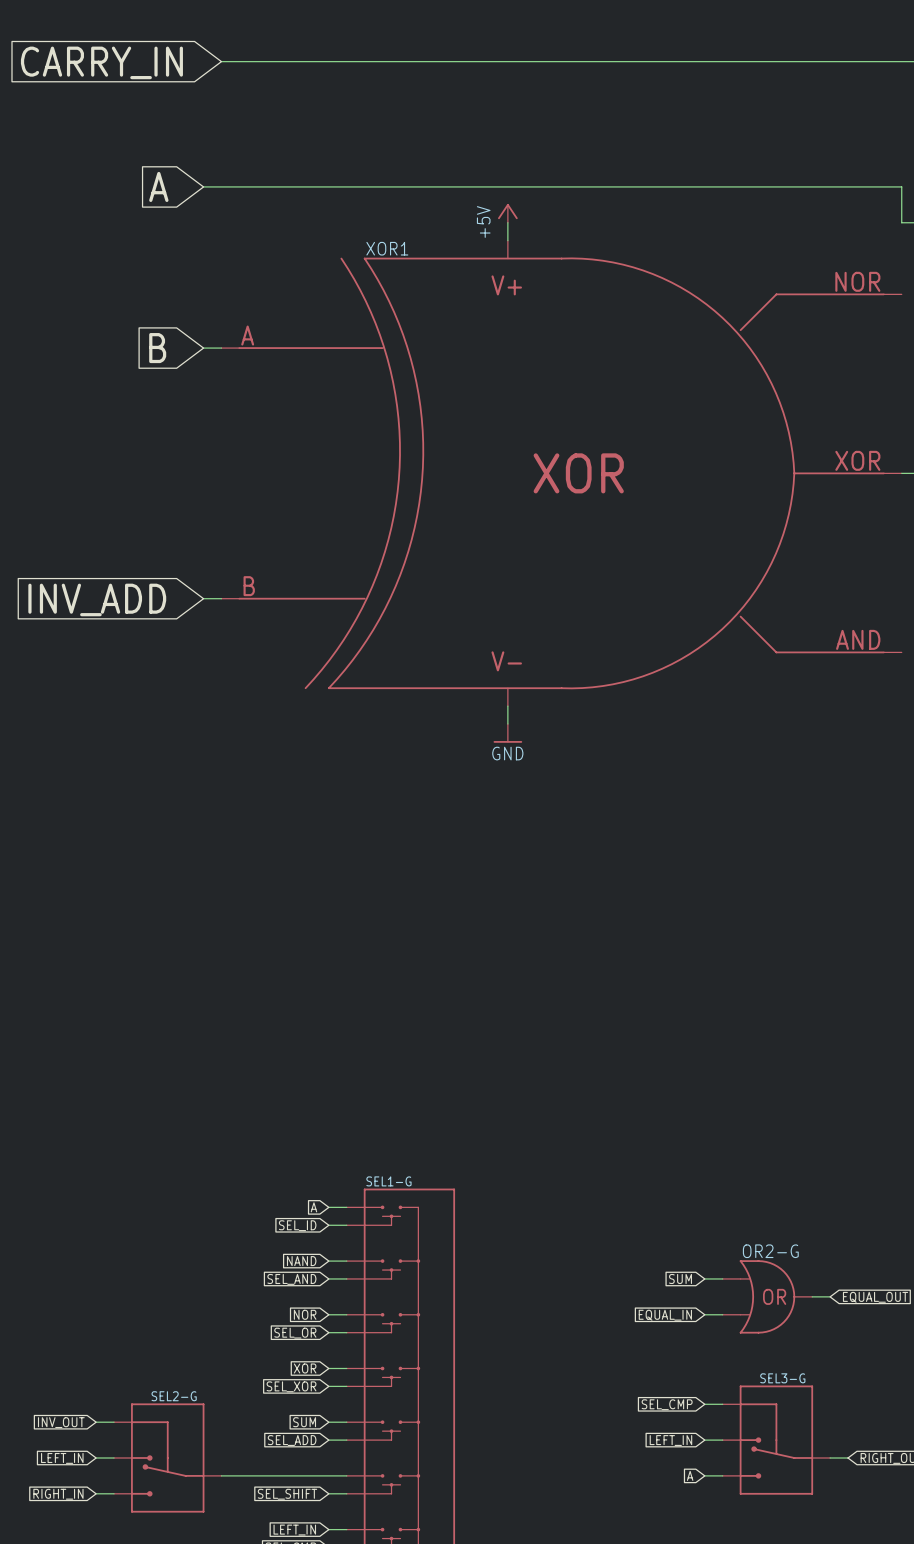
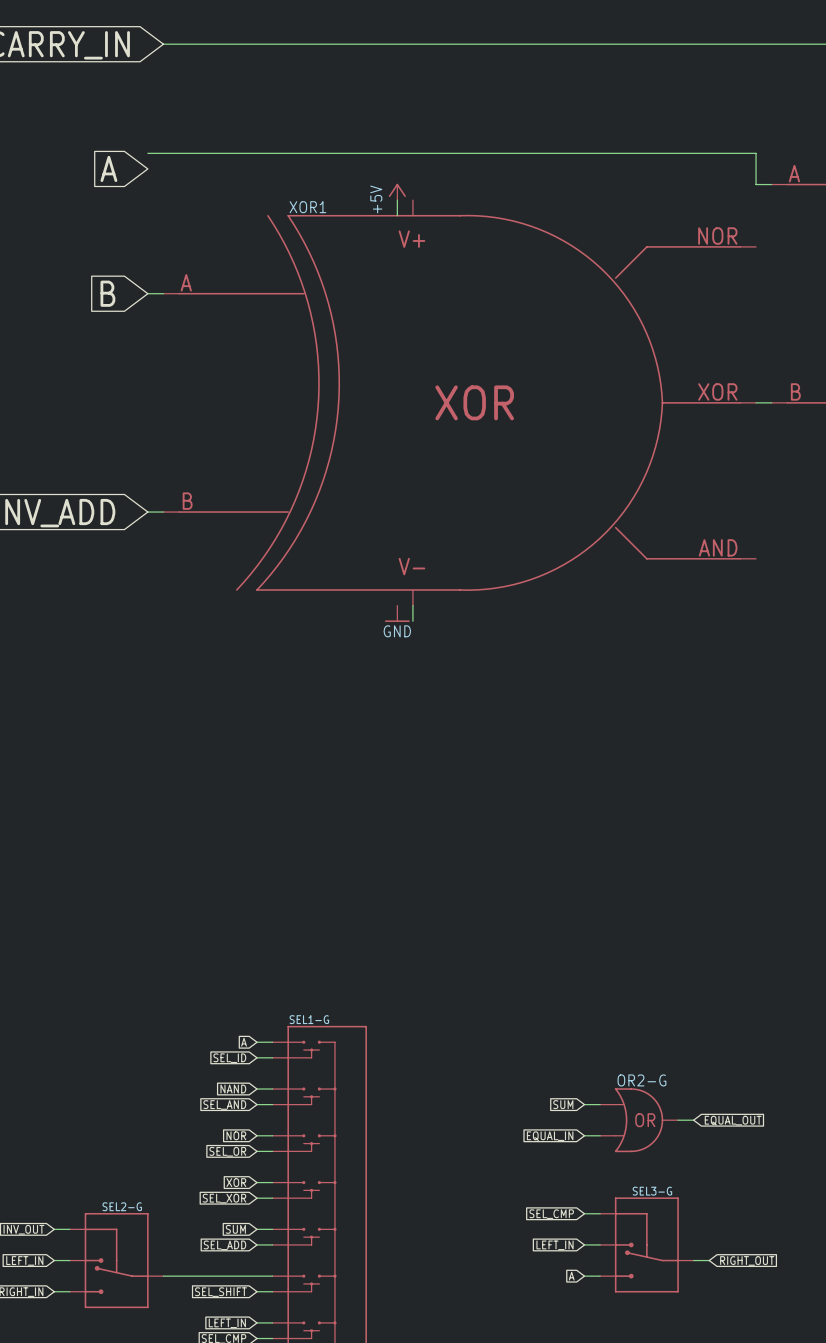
global label position: A (158, 186) -> A (108, 168)
power symbol position: +5V (507, 213) -> +5V (397, 191)
wire: (507, 222) (507, 240) -> (397, 200) (397, 215)
power symbol position: GND (507, 733) -> GND (397, 613)

